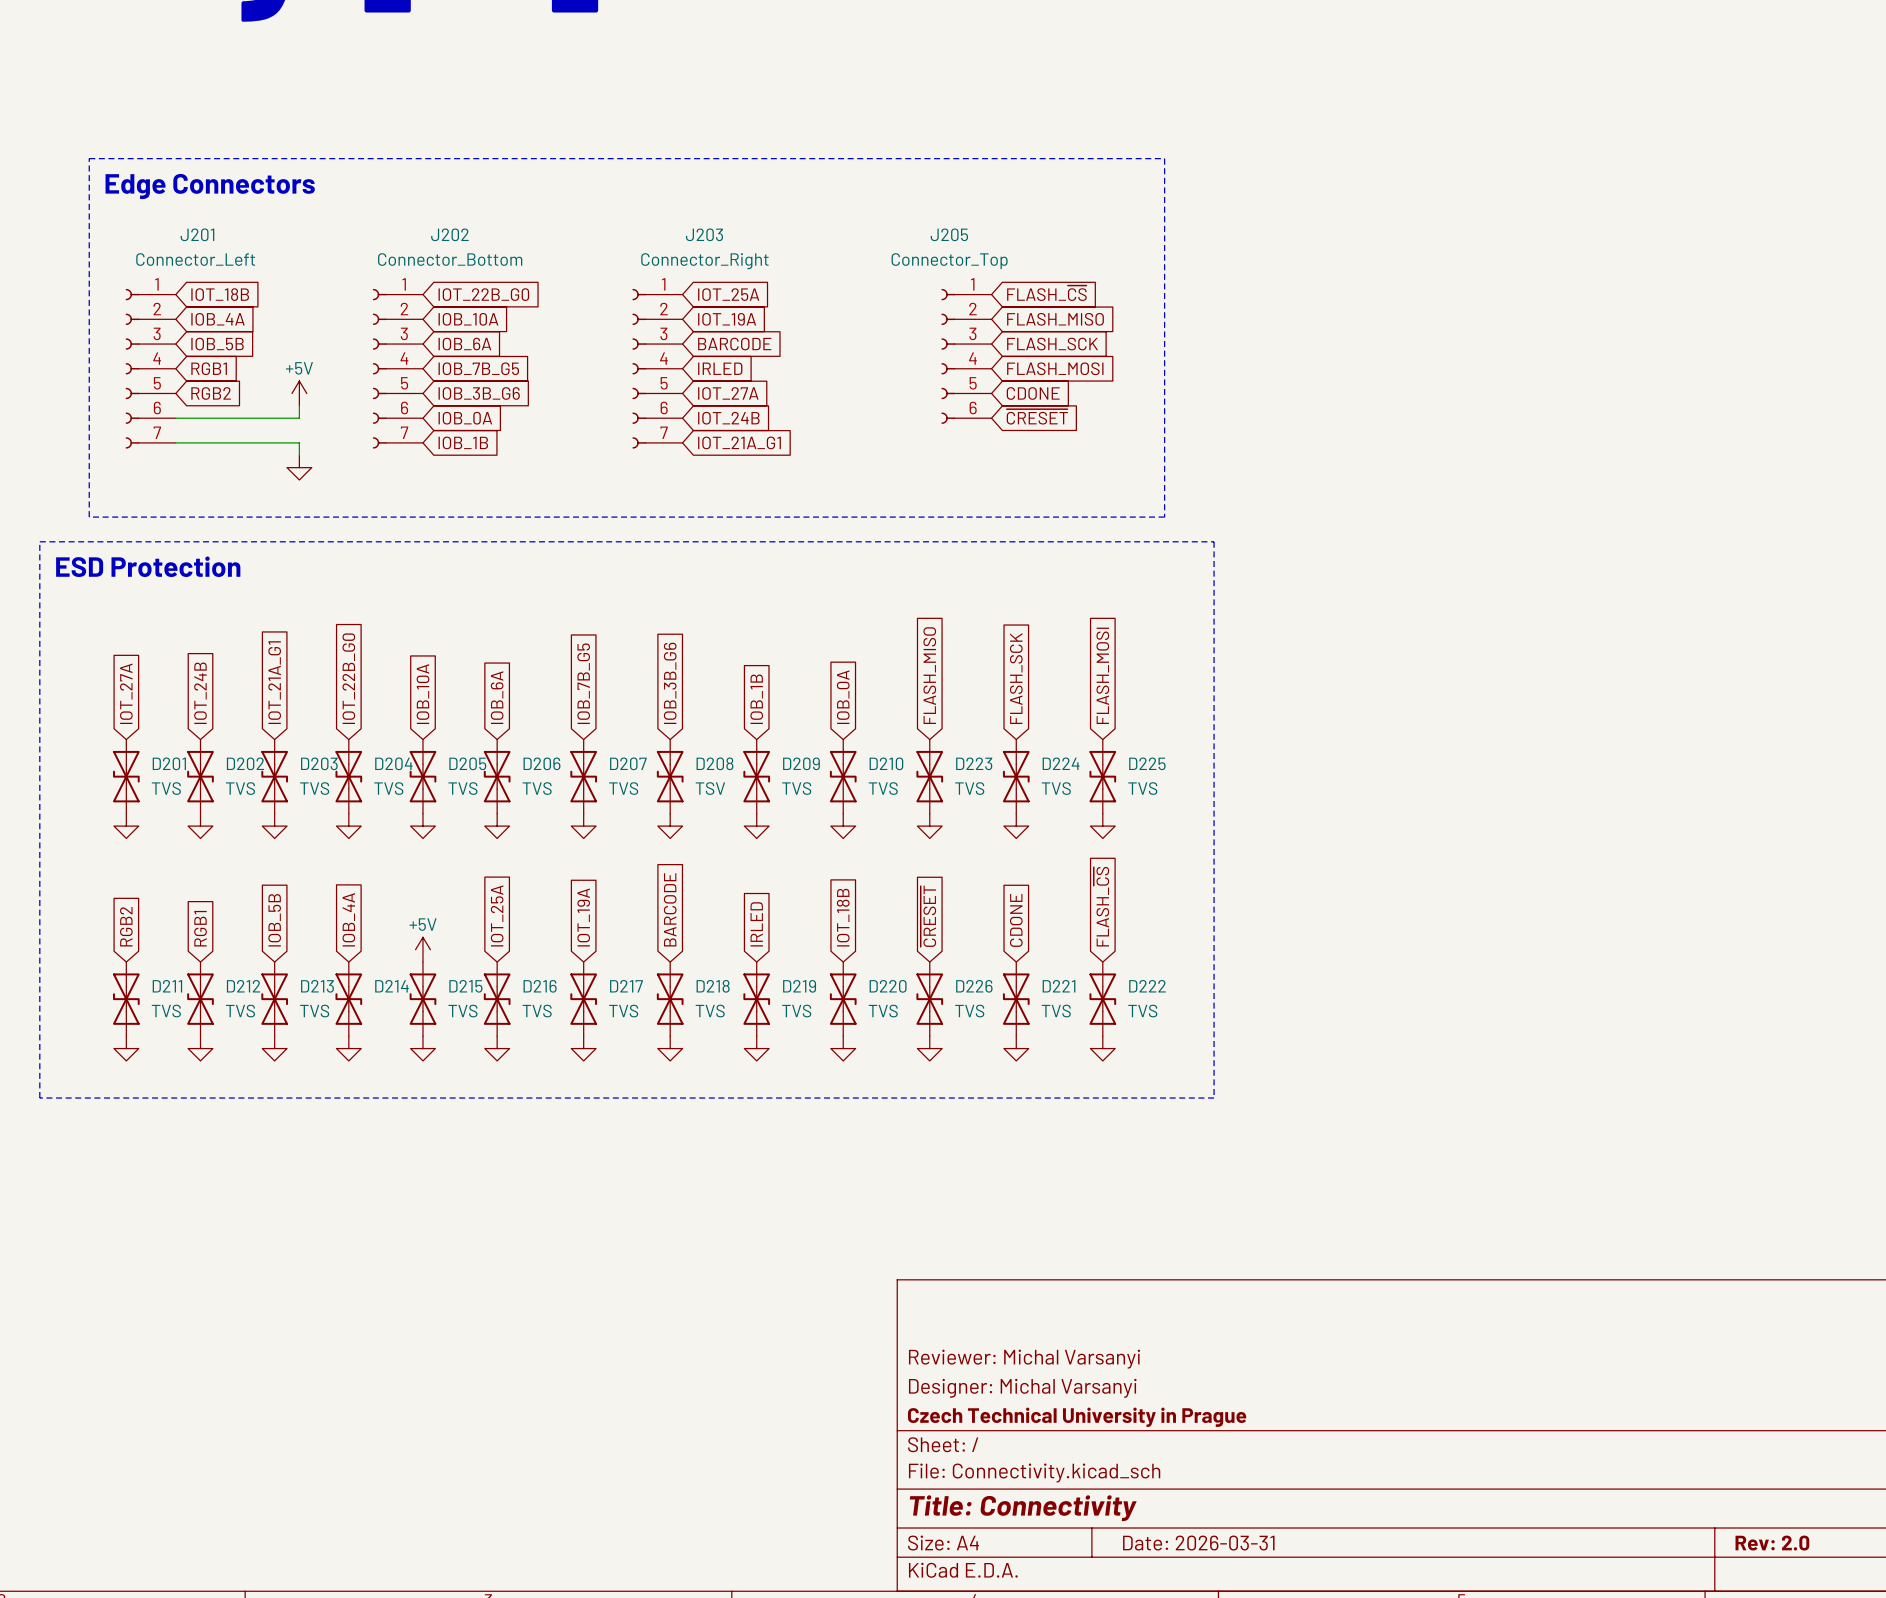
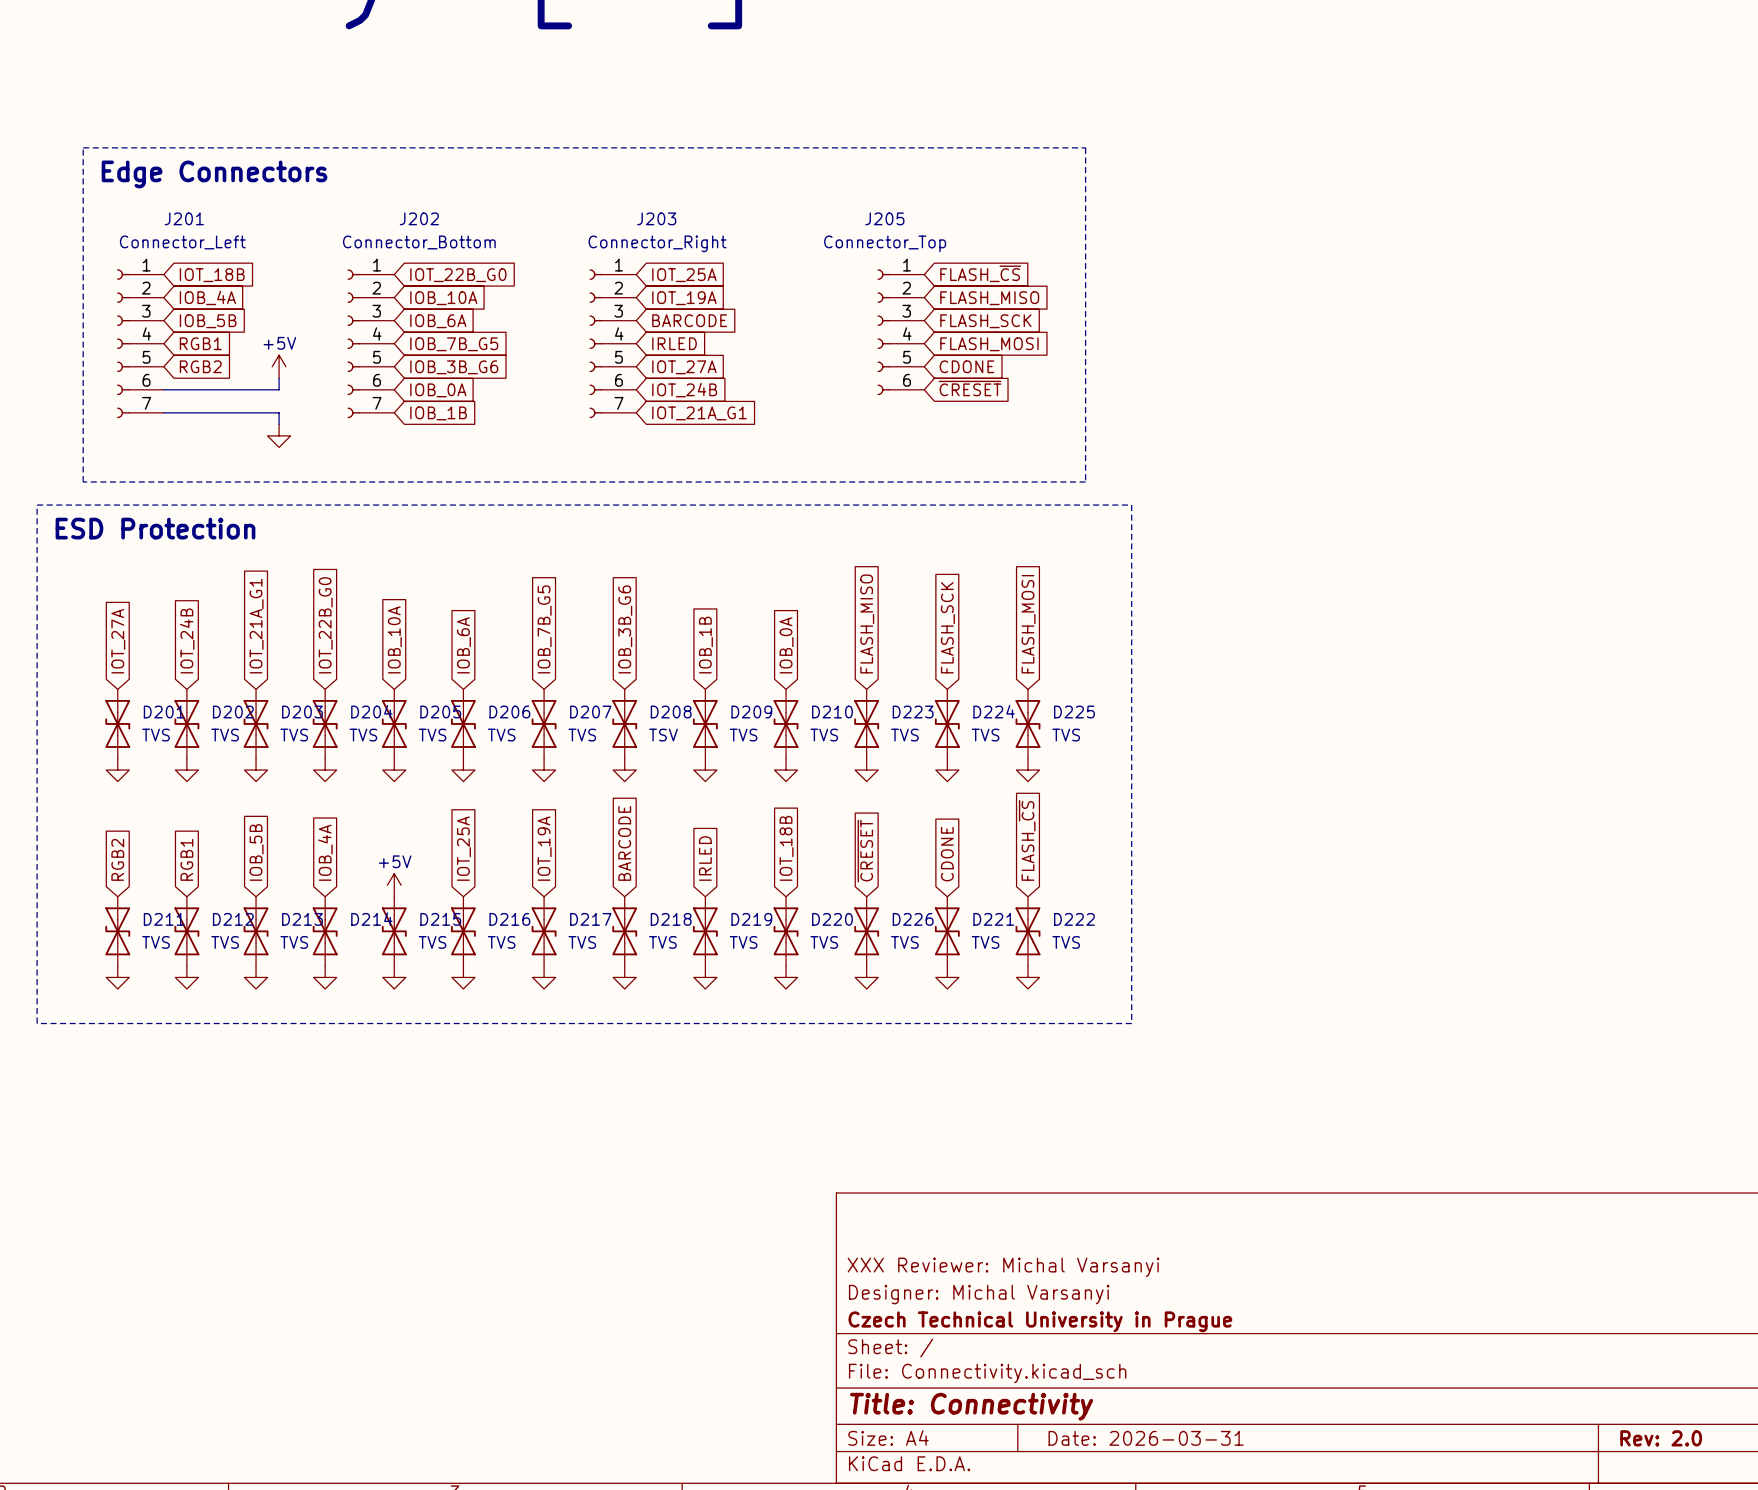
title block: Reviewer: Michal Varsanyi (1024, 1359) -> XXX Reviewer: Michal Varsanyi (1003, 1267)

